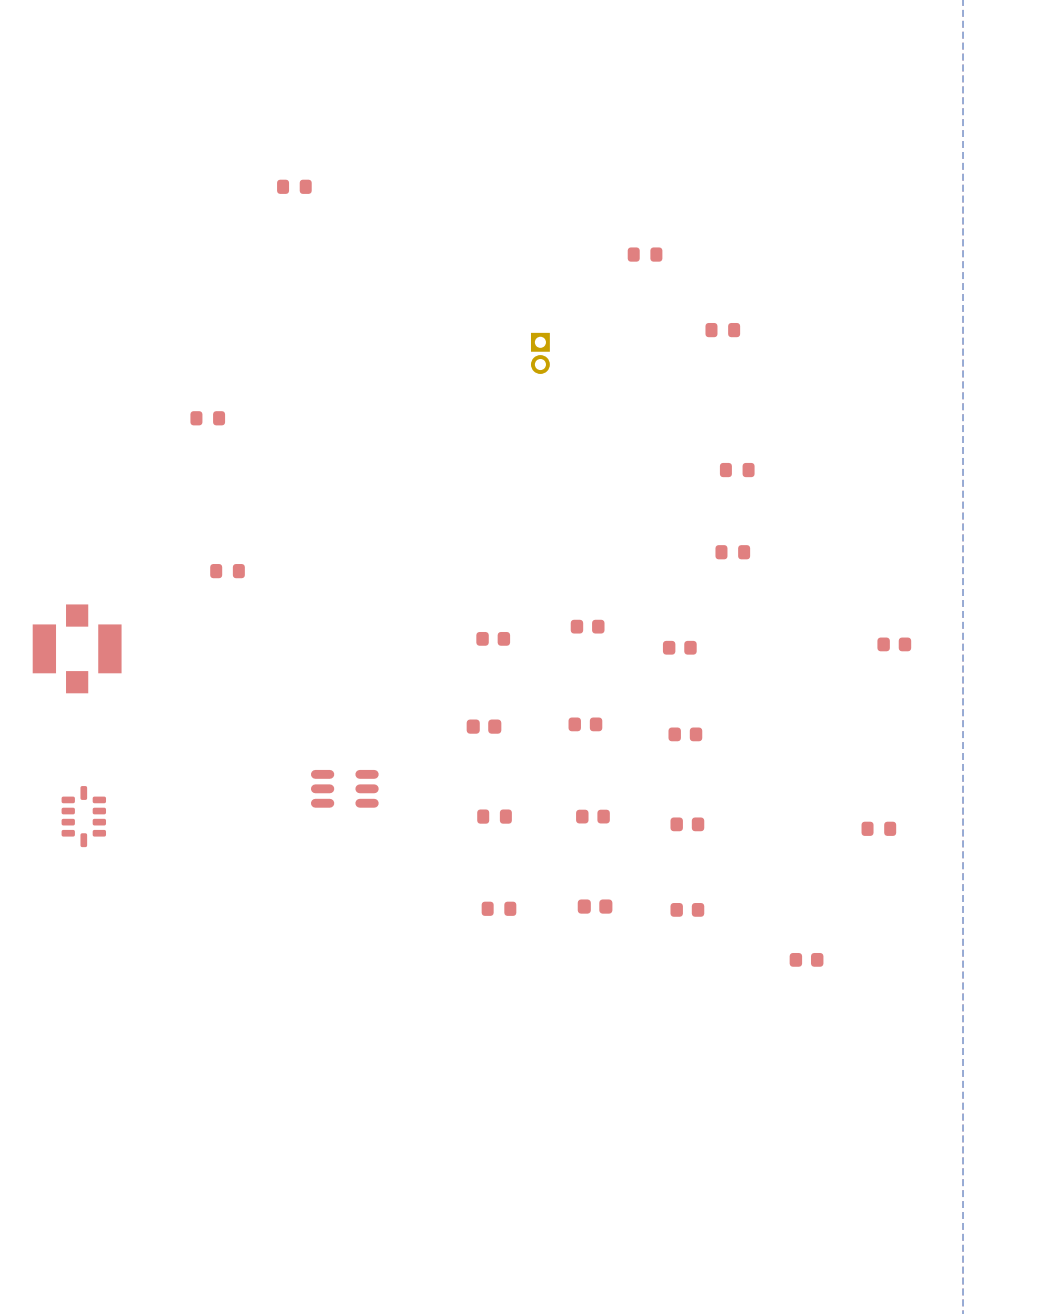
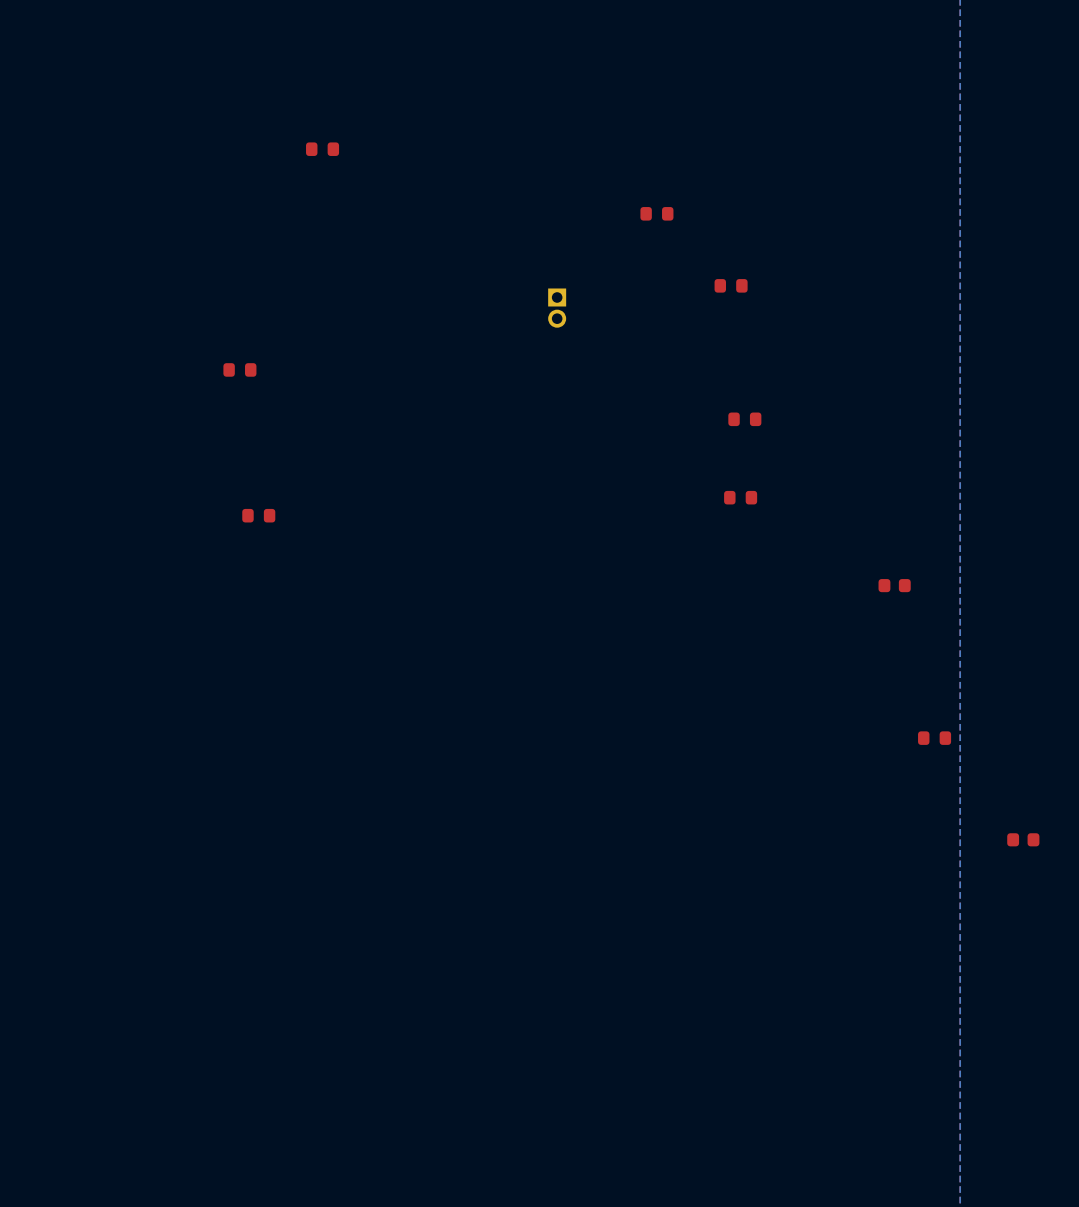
part: (587, 626) -> none
part: (493, 638) -> none
part: (679, 647) -> none
part: (77, 648) -> none
part: (585, 724) -> none
part: (483, 726) -> none
part: (685, 734) -> none
part: (344, 788) -> none
part: (83, 816) -> none
part: (494, 816) -> none
part: (592, 816) -> none
part: (687, 824) -> none
part position: (878, 828) -> (934, 738)
part: (595, 906) -> none
part: (498, 908) -> none
part: (687, 909) -> none
part: none -> (1023, 839)
part: (806, 959) -> none

